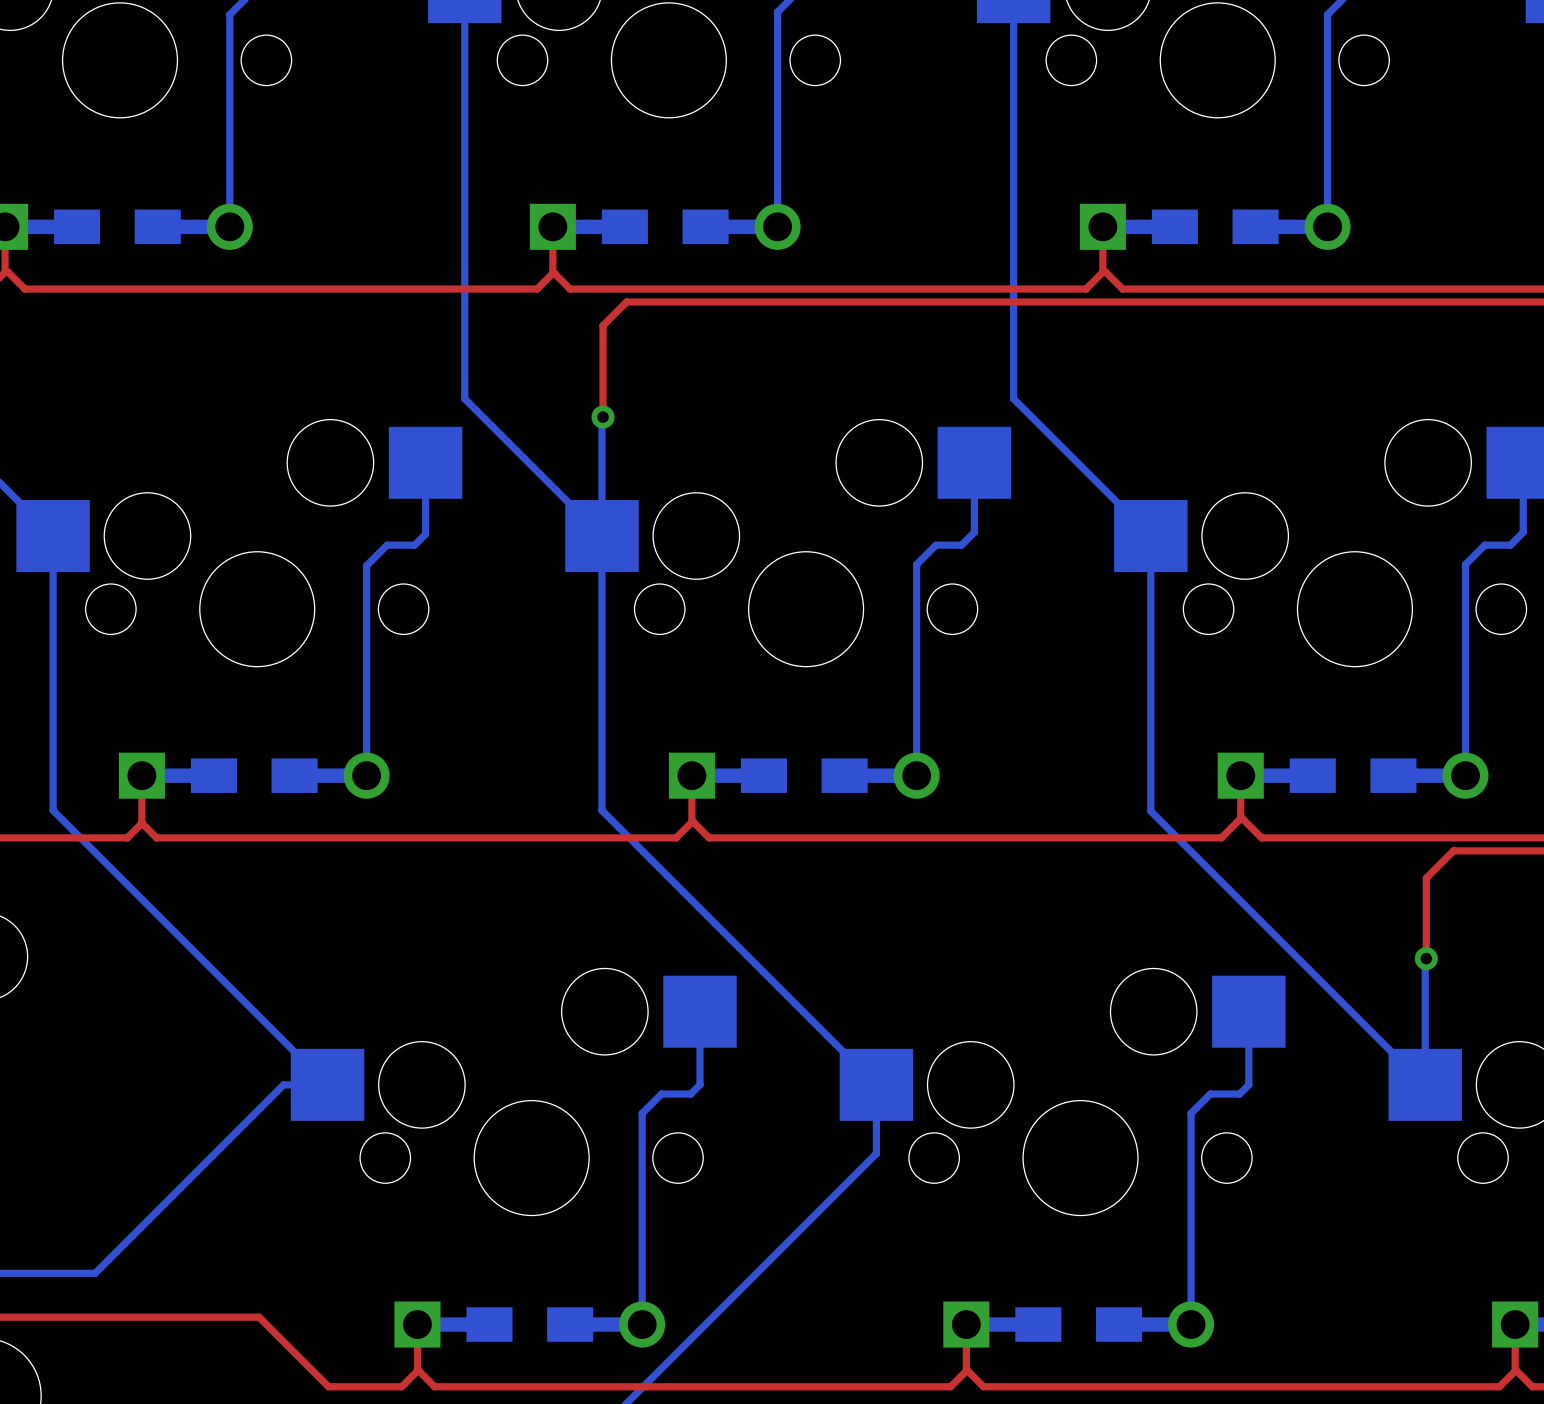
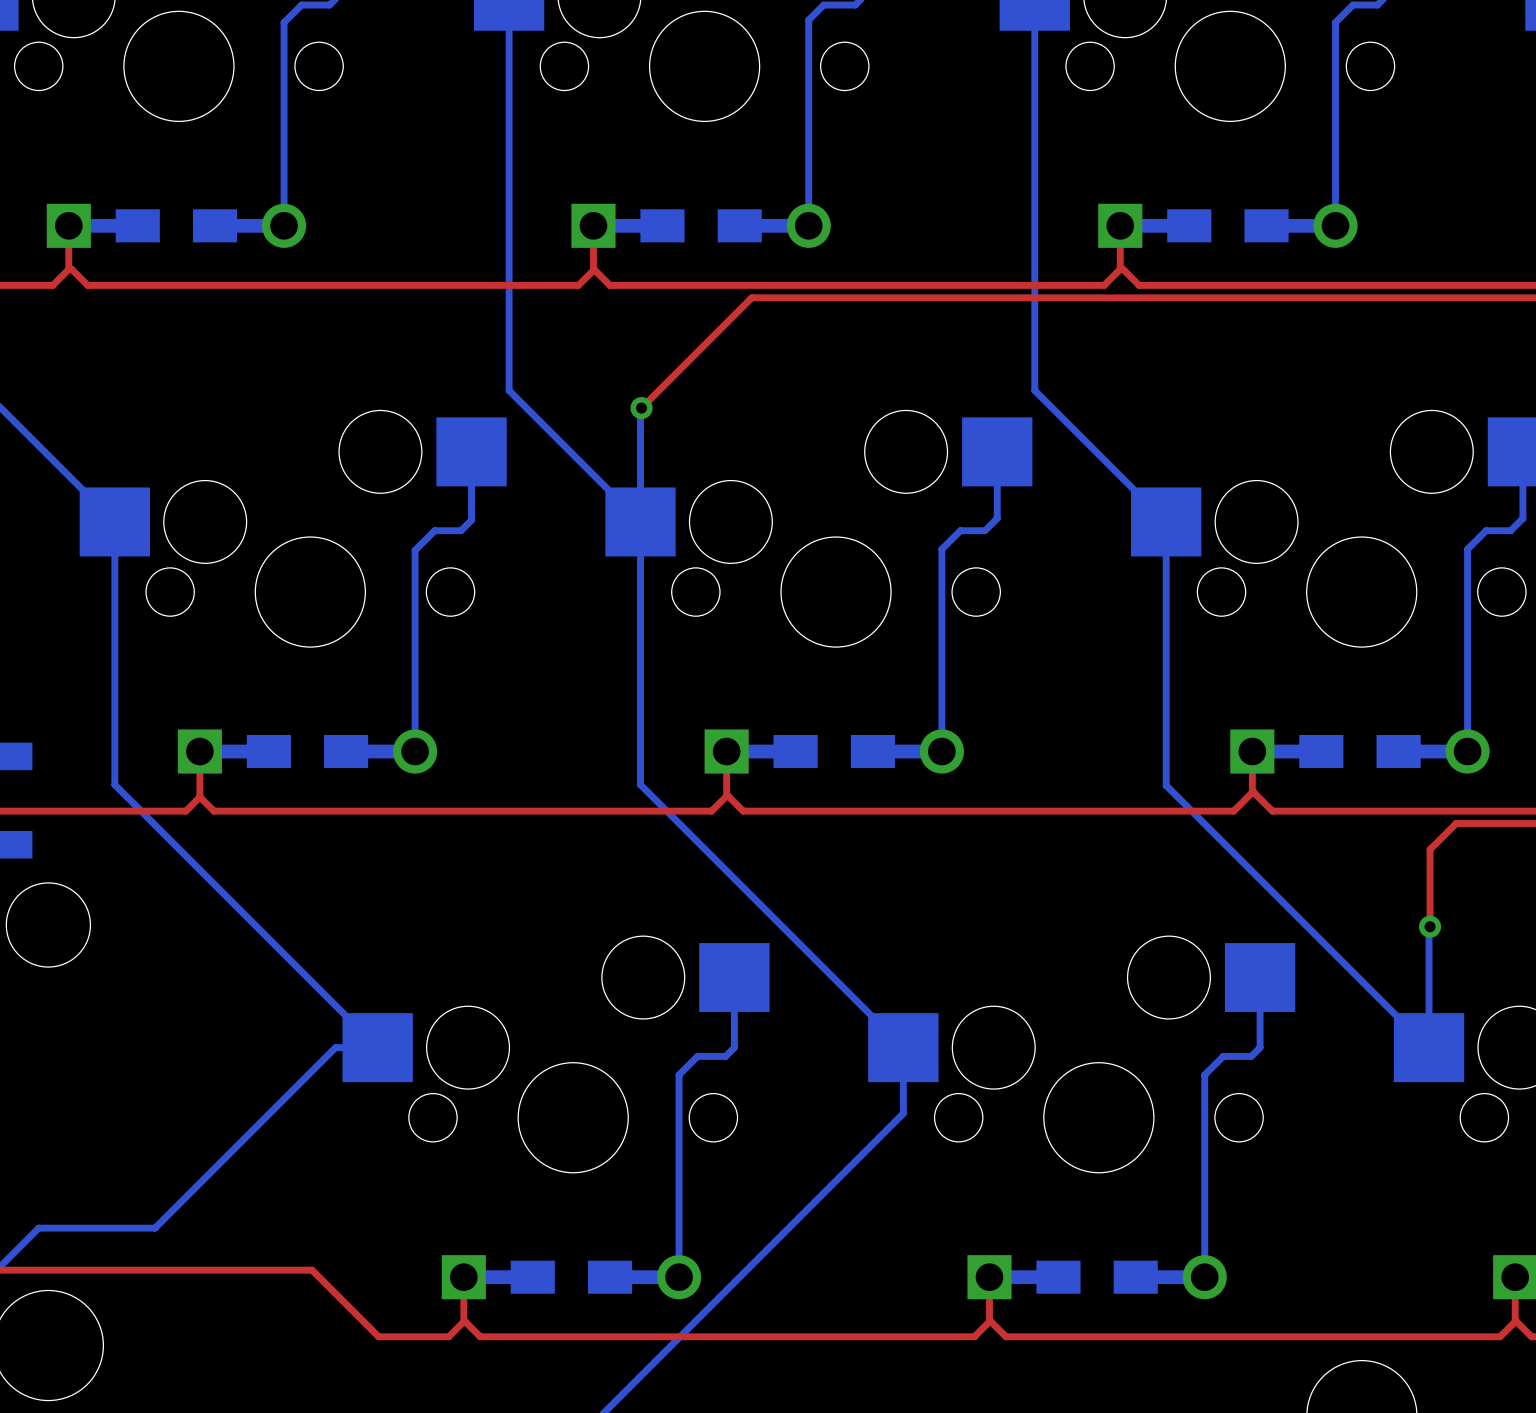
top track: (718, 302) (626, 302) (603, 325) (603, 417) -> (751, 297) (641, 408)

